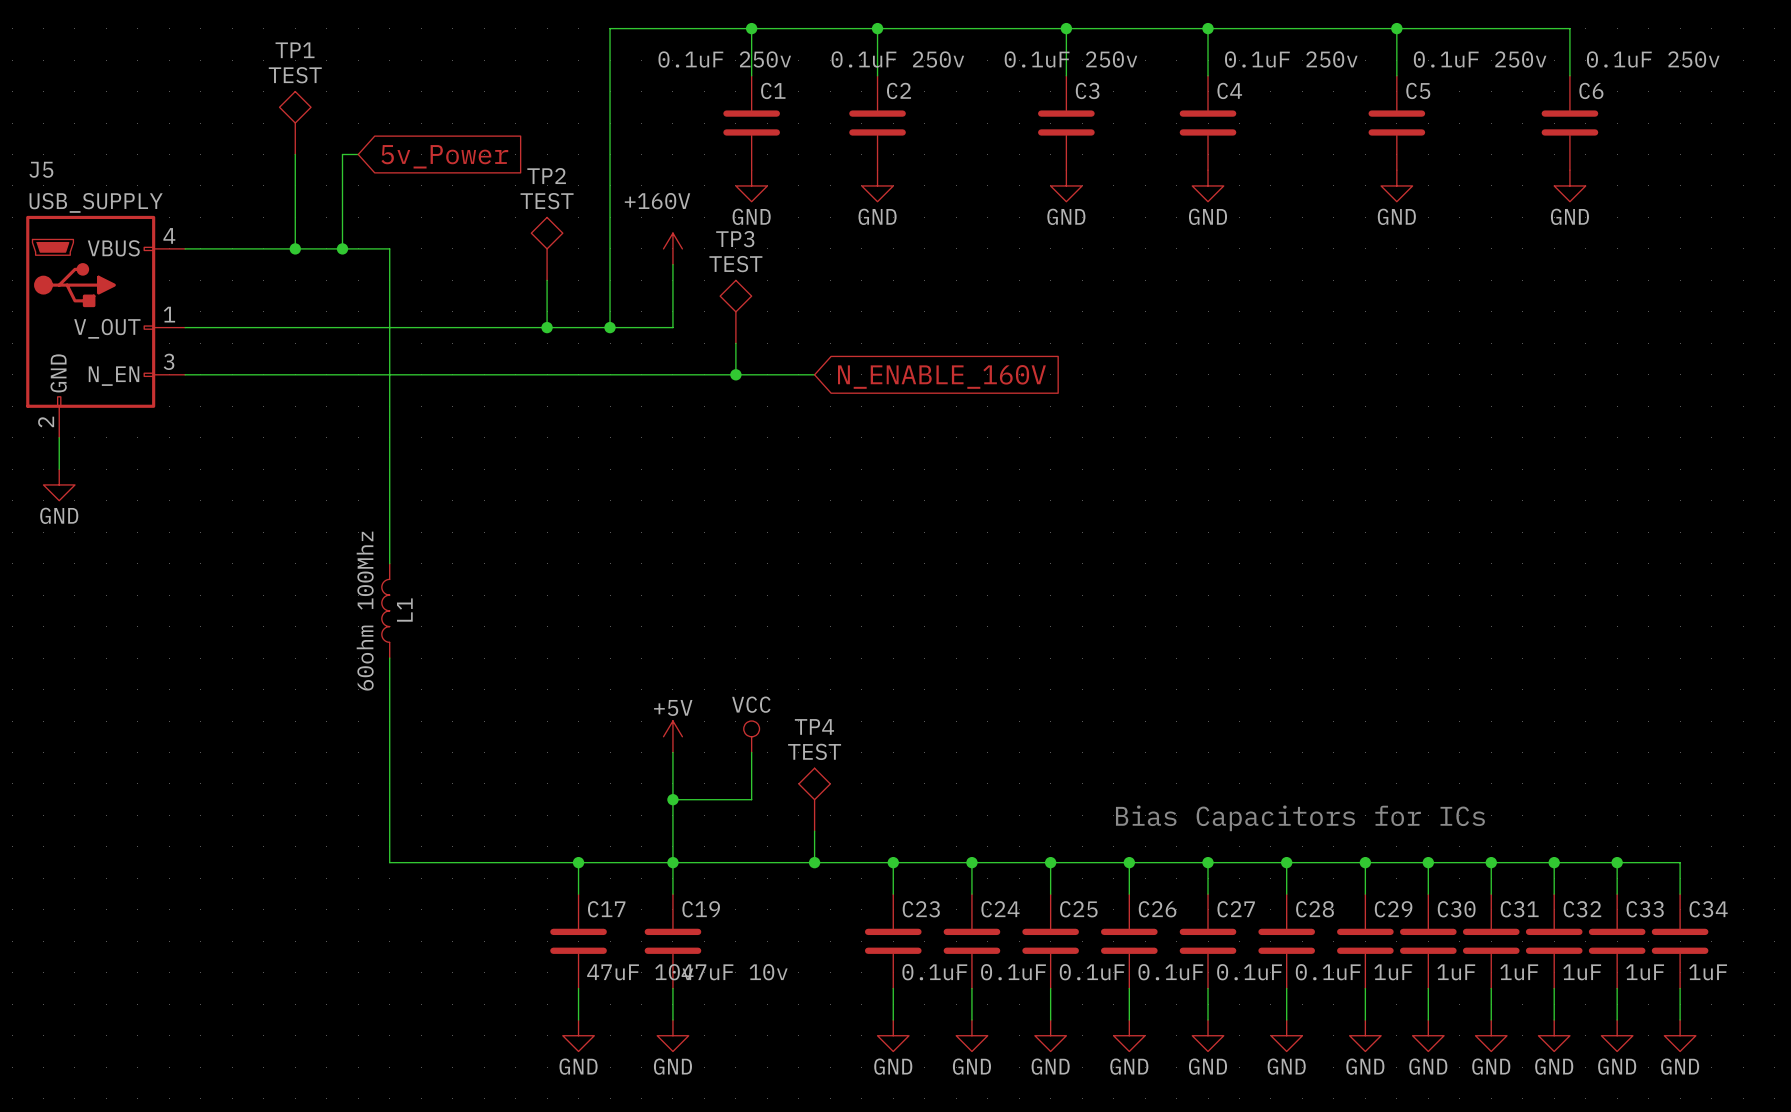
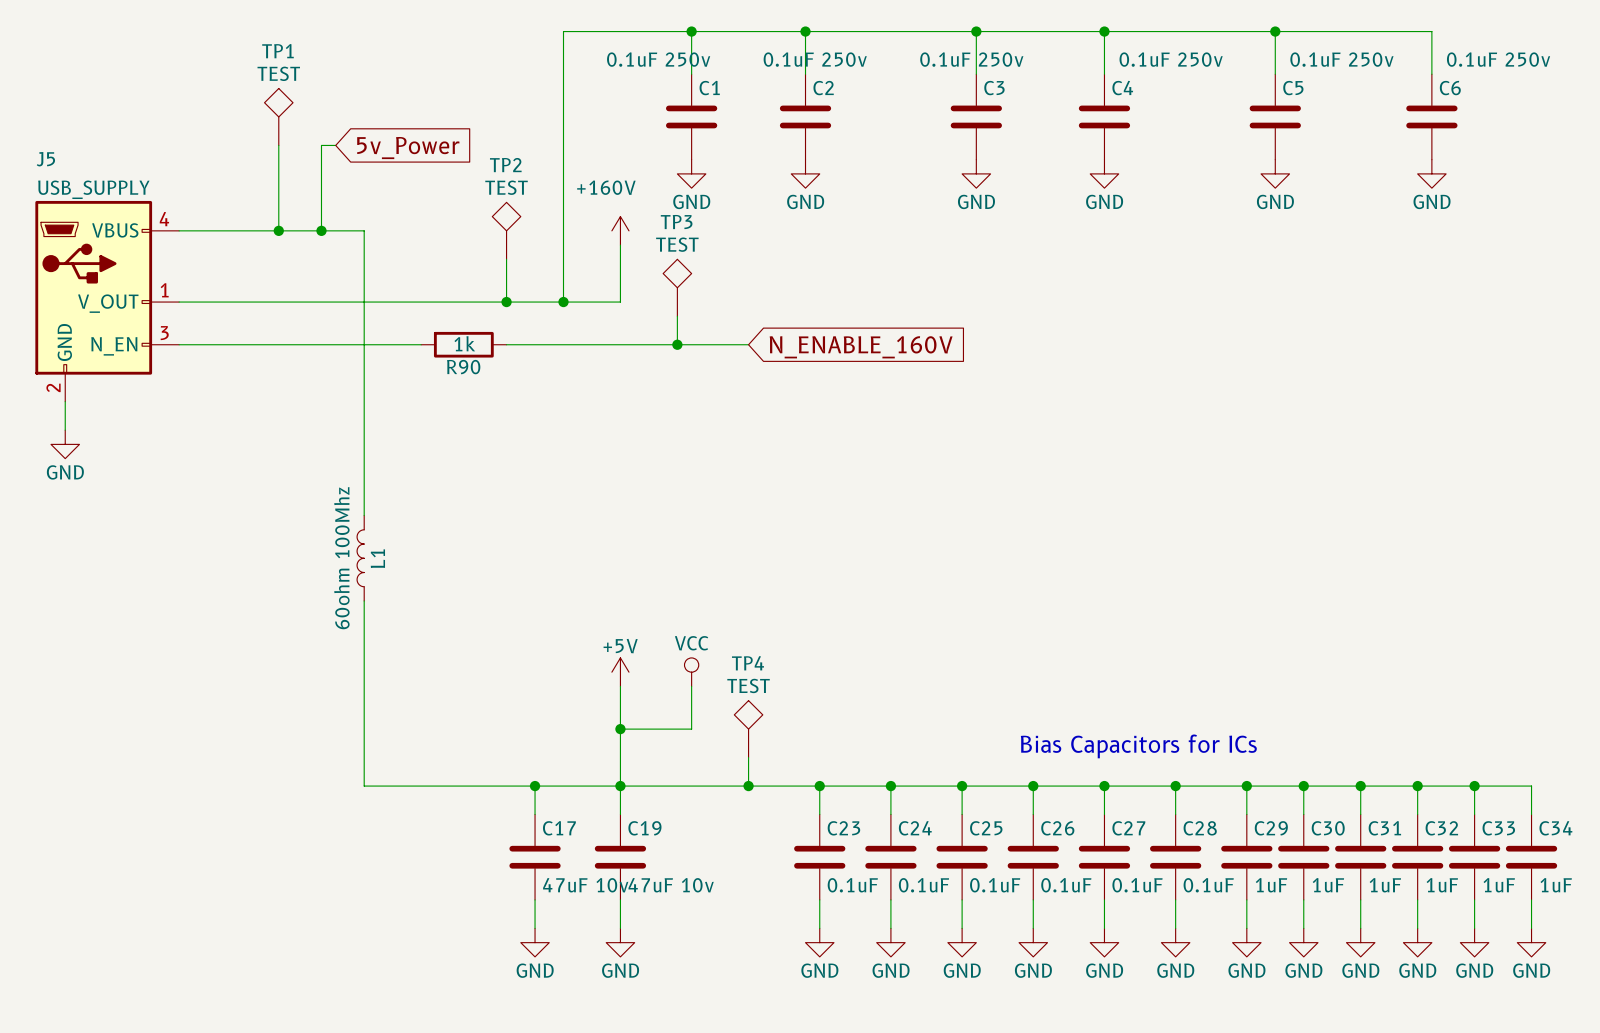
wire: (452, 374) (547, 374) -> none
R90: none -> 1k (463, 344)

